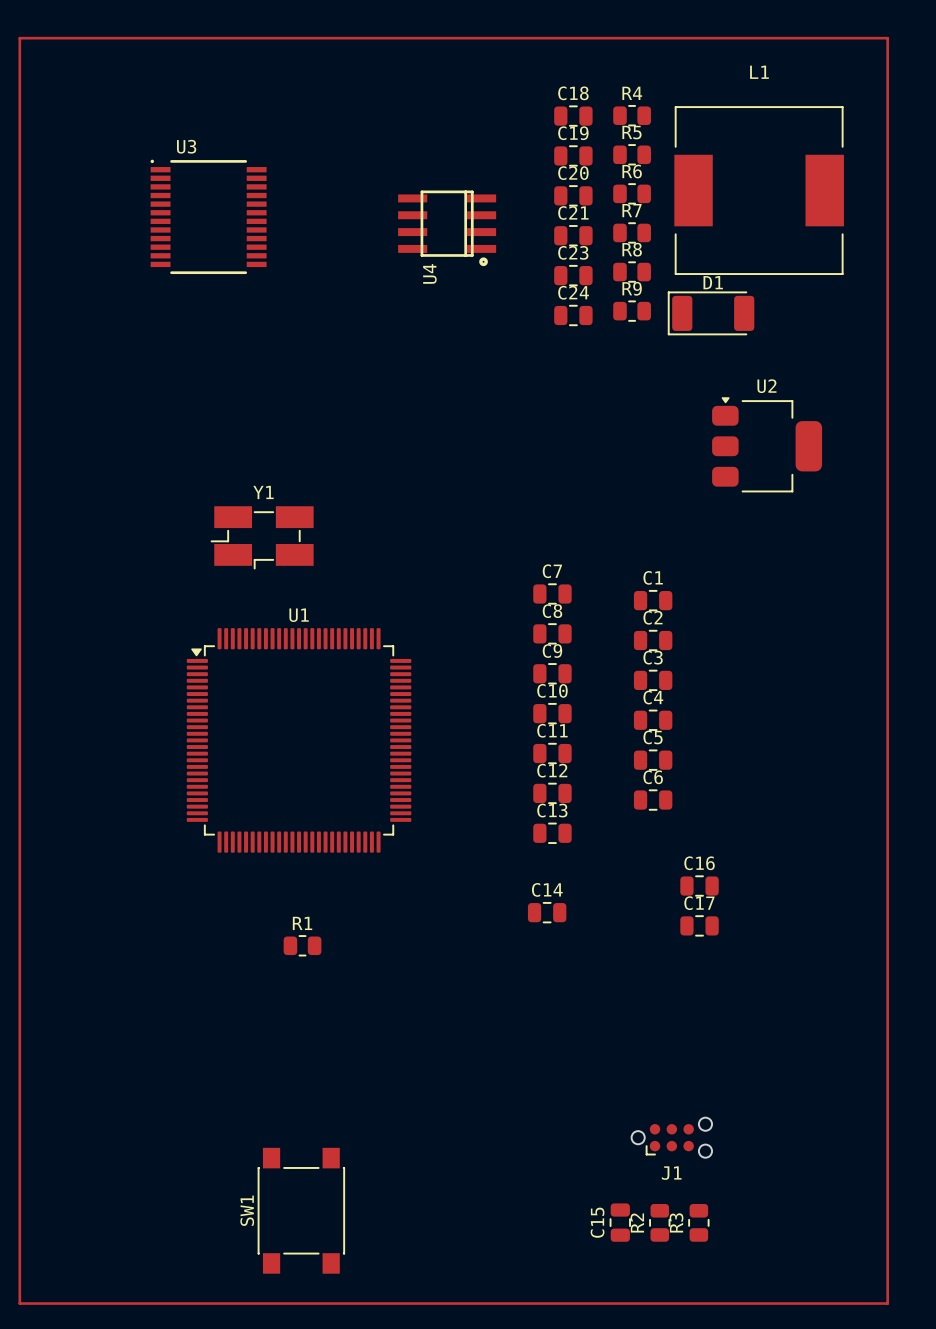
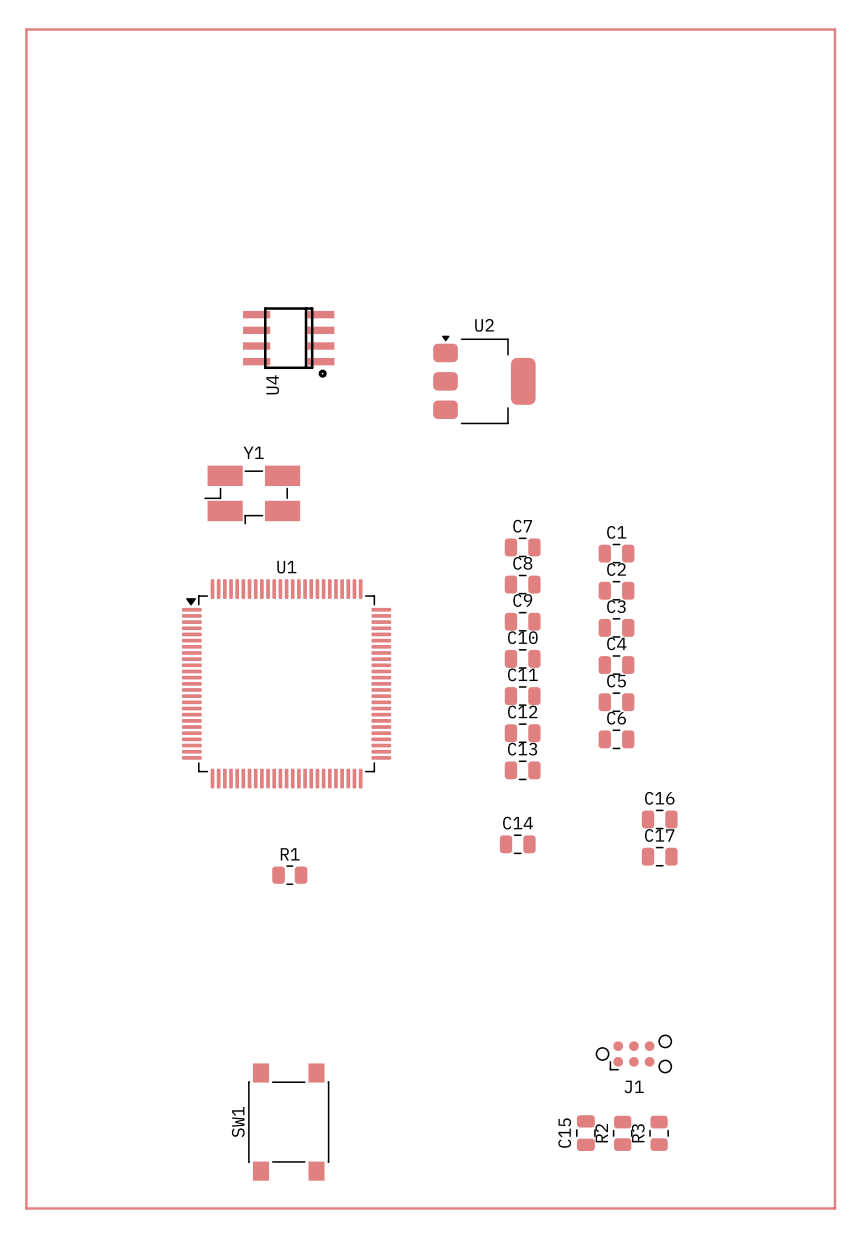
R4: (632, 115) -> none
C18: (573, 116) -> none
R5: (632, 154) -> none
C19: (573, 155) -> none
L1: (759, 190) -> none
R6: (632, 193) -> none
C20: (573, 195) -> none
U3: (208, 216) -> none
U4 position: (447, 228) -> (288, 342)
R7: (632, 232) -> none
C21: (573, 235) -> none
R8: (632, 272) -> none
C23: (573, 275) -> none
R9: (632, 311) -> none
D1: (711, 313) -> none
C24: (573, 315) -> none
U2 position: (767, 444) -> (484, 379)

